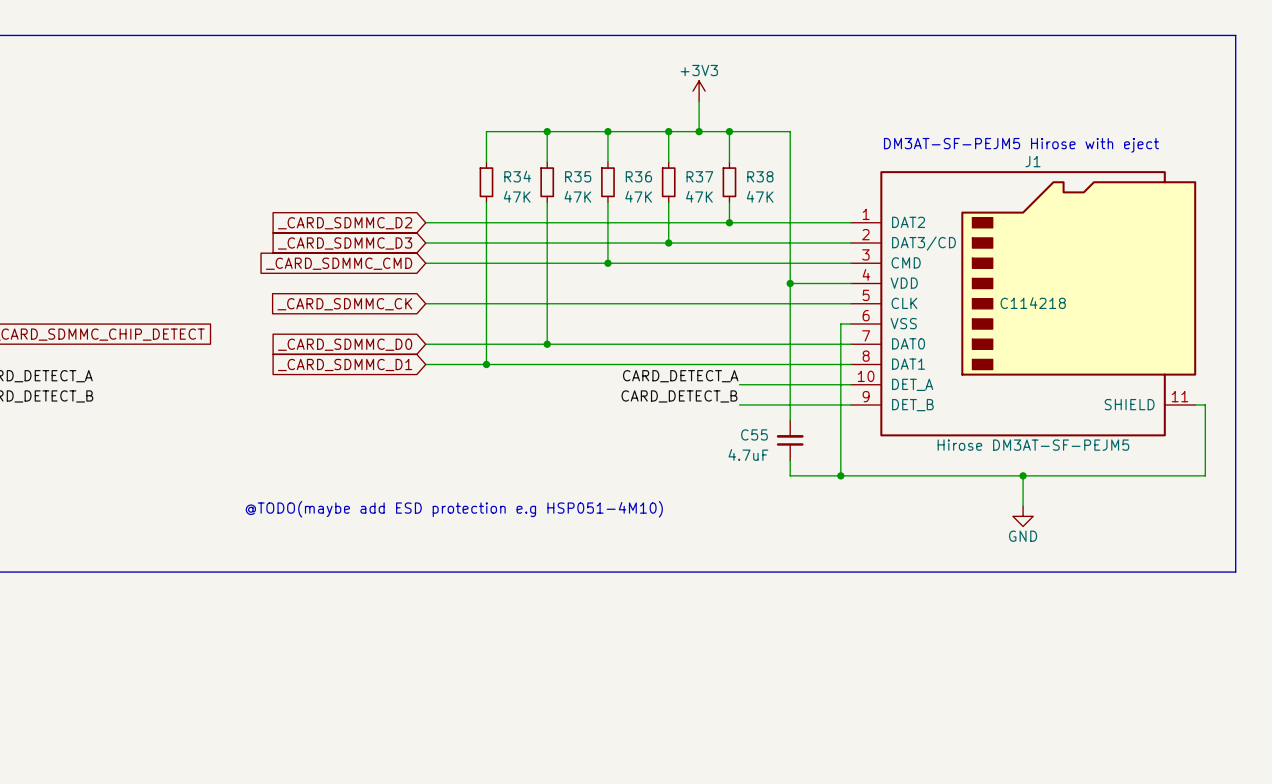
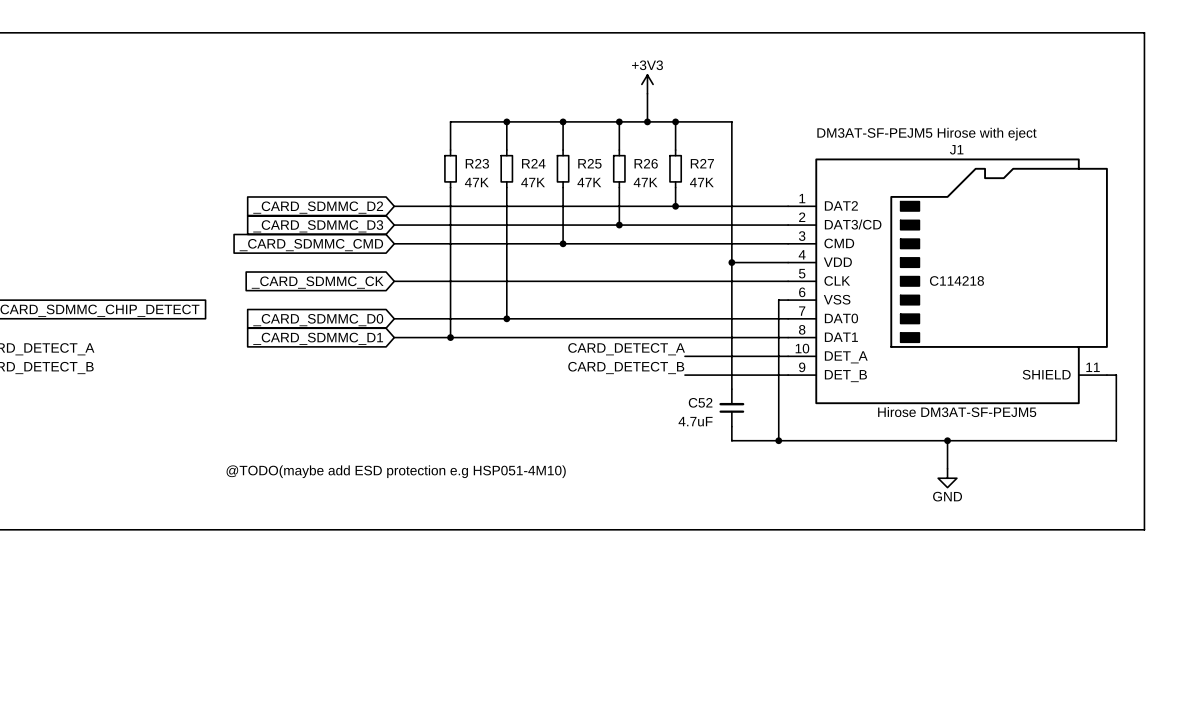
R34 name: R34 (517, 176) -> R23 (477, 163)
R35 name: R35 (578, 176) -> R24 (533, 163)
R36 name: R36 (638, 176) -> R25 (589, 163)
R37 name: R37 (699, 176) -> R26 (646, 163)
R38 name: R38 (760, 176) -> R27 (702, 163)
C55 name: C55 (754, 434) -> C52 (700, 402)

